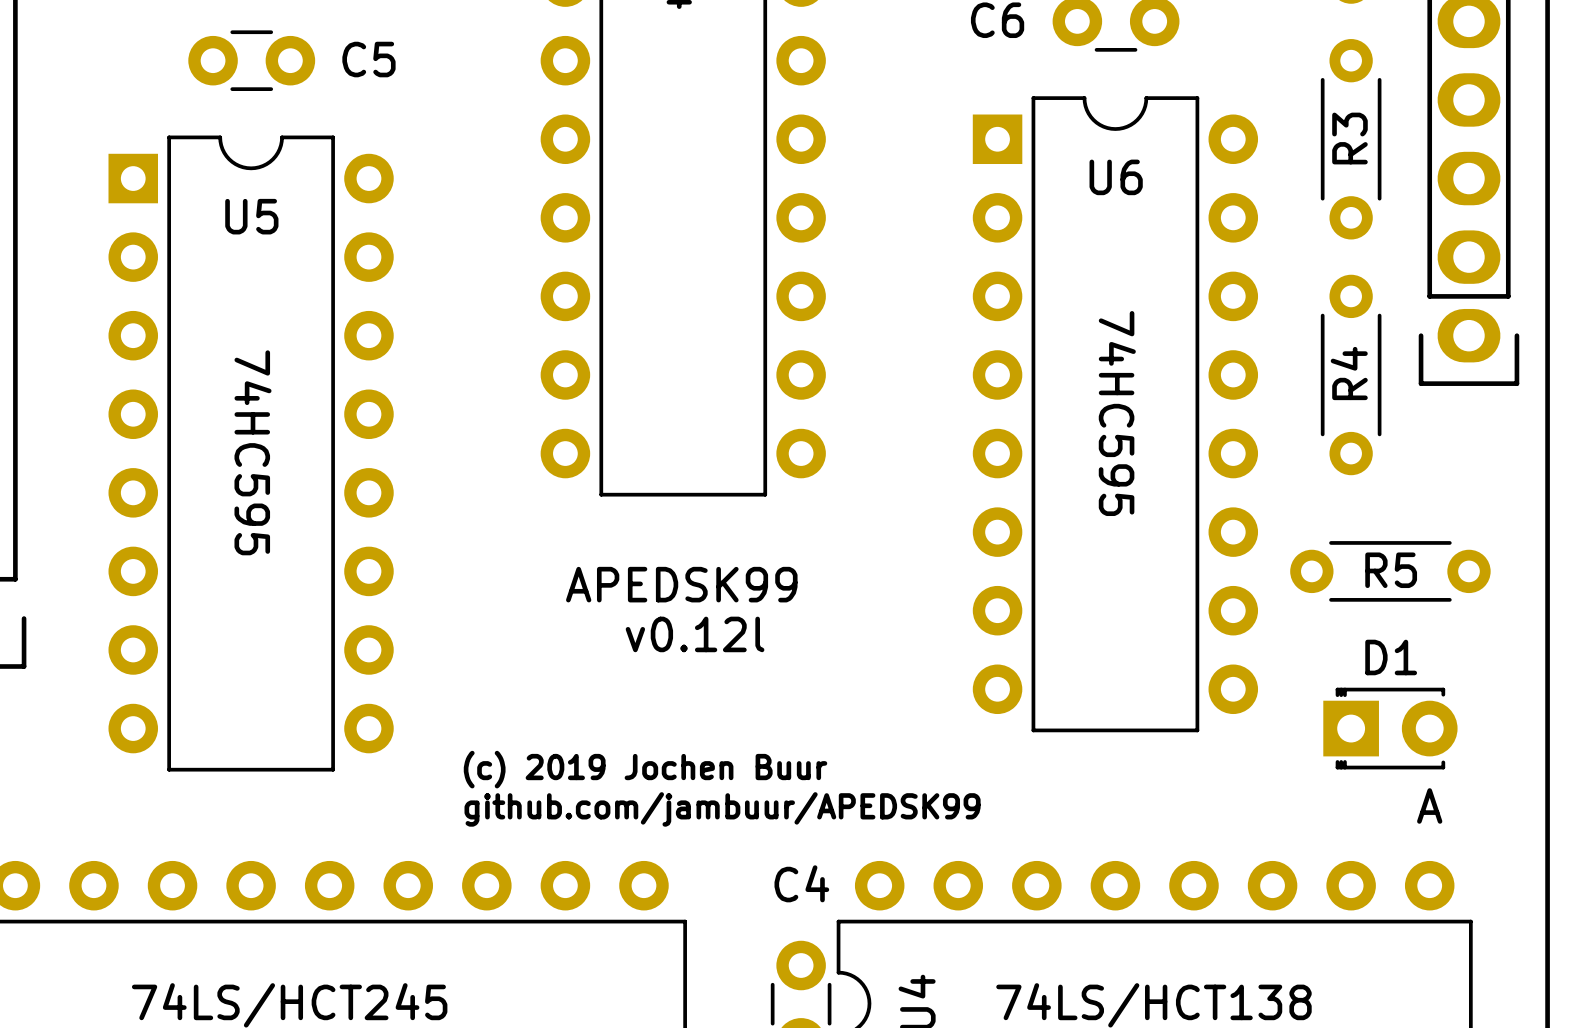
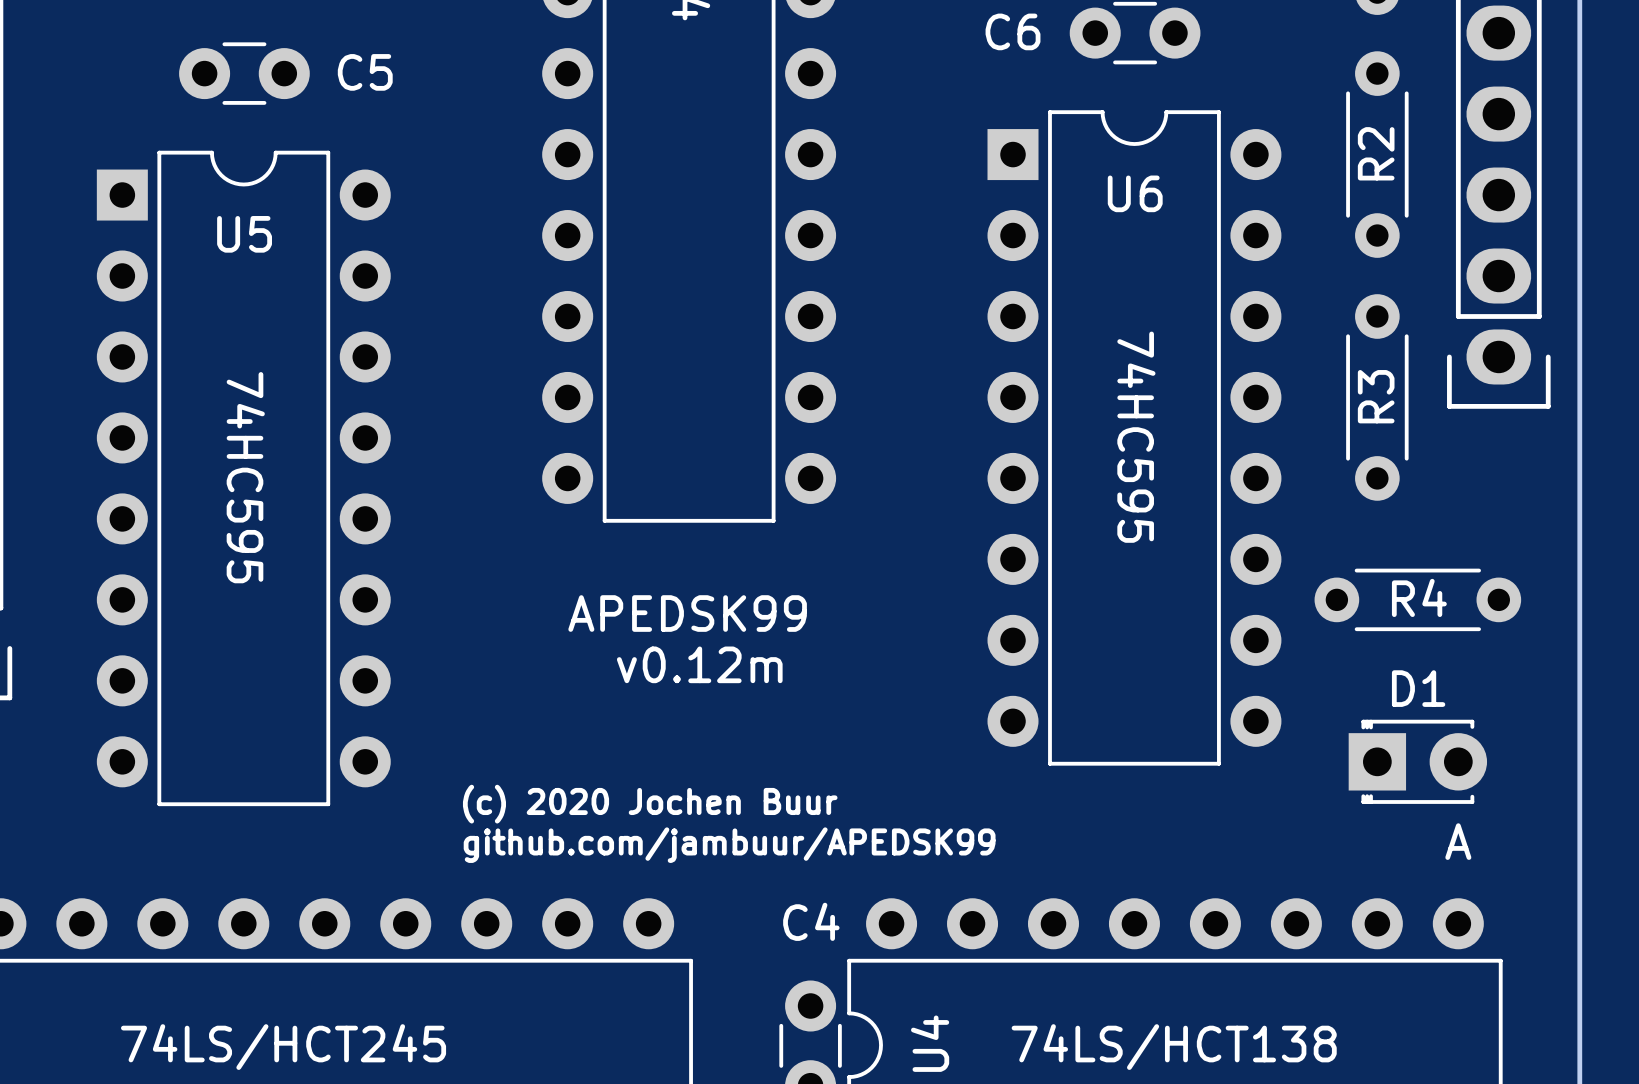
R3 name: R3 (1349, 138) -> R2 (1376, 153)
R4 name: R4 (1349, 373) -> R3 (1376, 396)
R5 name: R5 (1391, 570) -> R4 (1419, 597)
text: v0.12l (695, 634) -> v0.12m (699, 664)
text: (c) 2019 Jochen Buur (645, 769) -> (c) 2020 Jochen Buur (650, 804)

